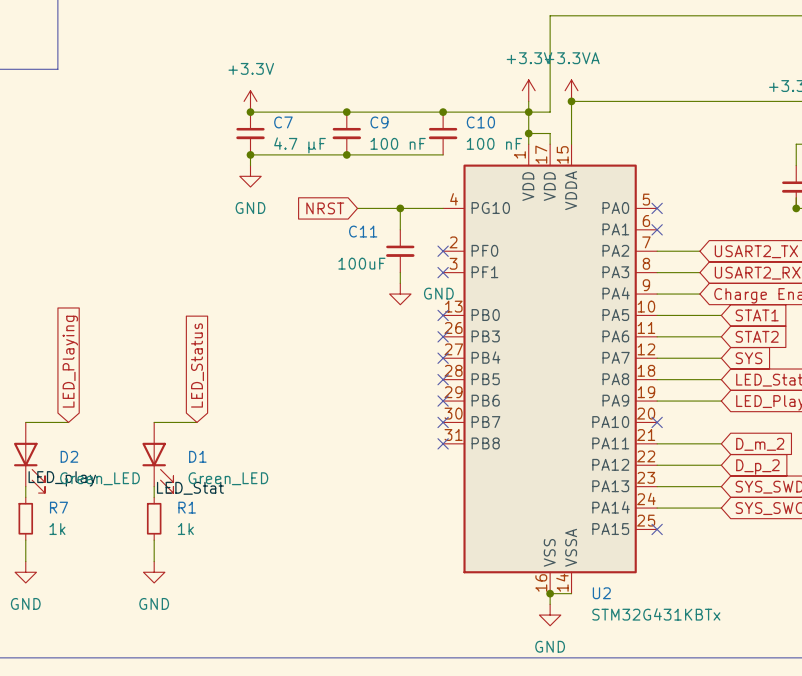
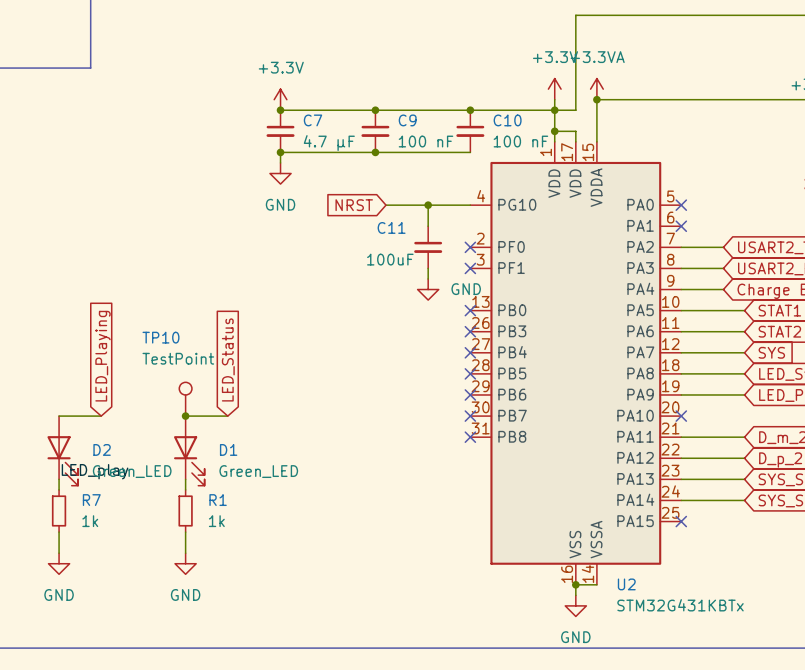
TP10: none -> TestPoint (185, 399)
junction: none -> (185, 416)
label: LED_Stat (190, 488) -> none

